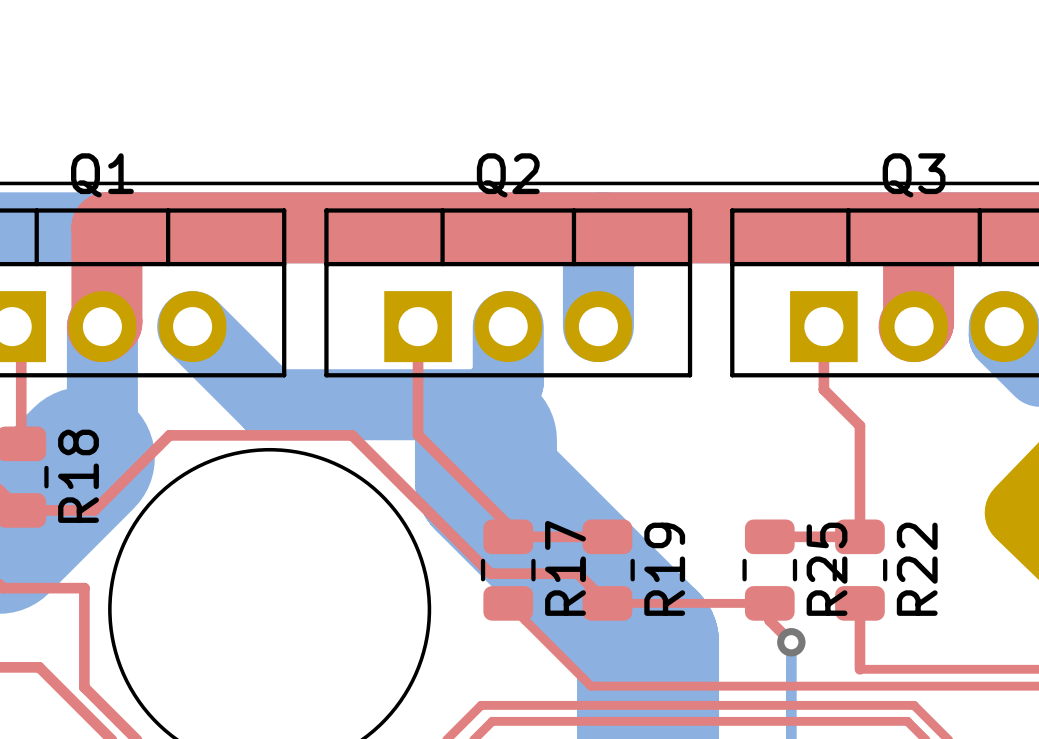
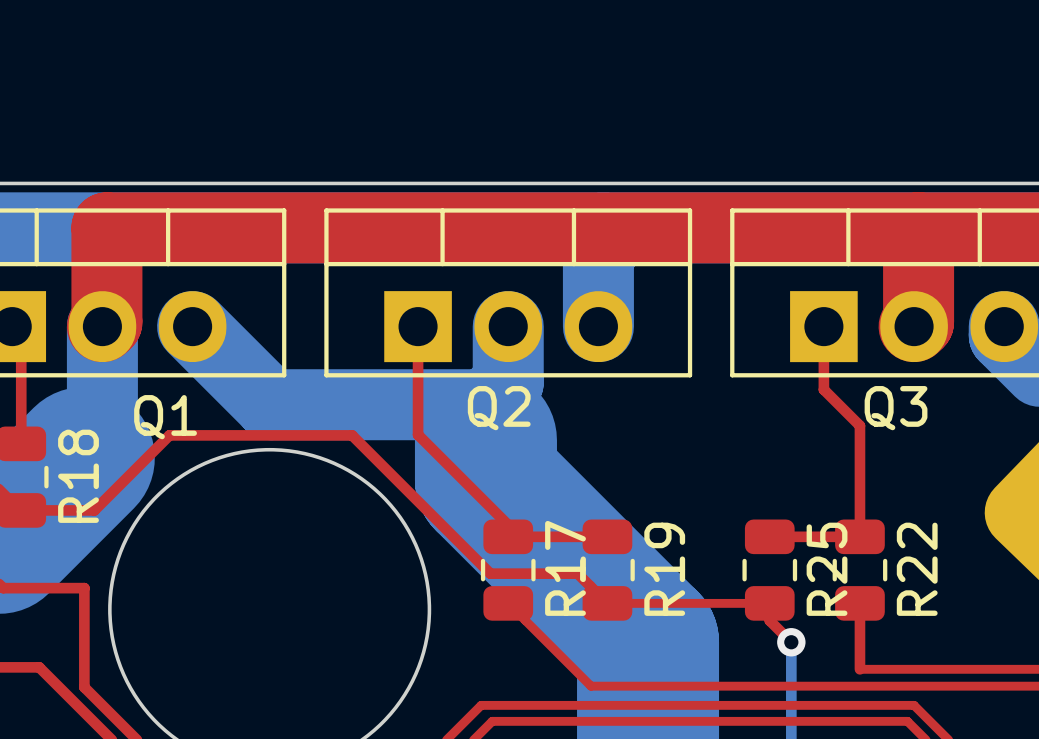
Q1 name position: Q1 (102, 175) -> Q1 (165, 417)
Q2 name position: Q2 (508, 175) -> Q2 (499, 408)
Q3 name position: Q3 (914, 175) -> Q3 (896, 408)

